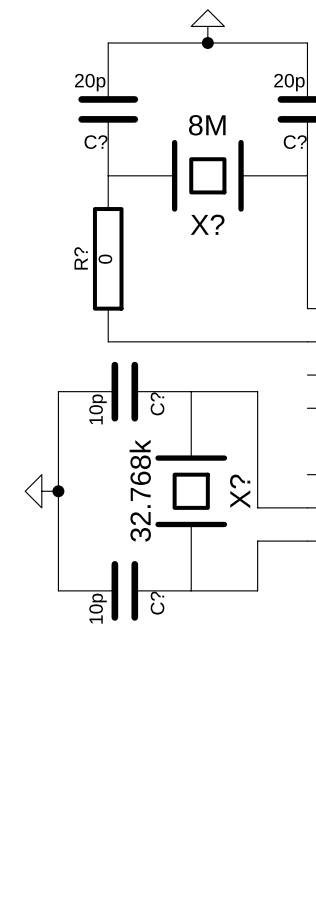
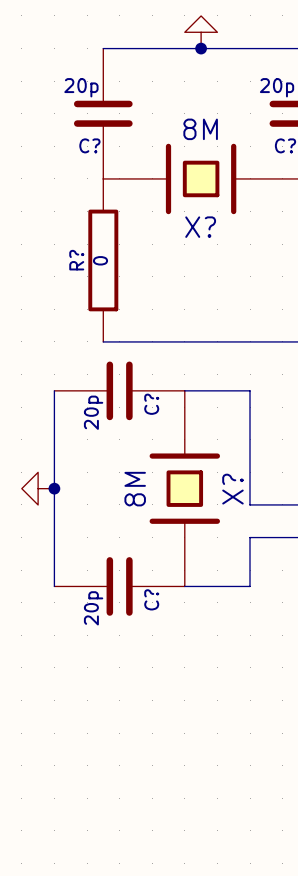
C? value: 10p (98, 409) -> 20p (93, 412)
X? value: 32.768k (140, 490) -> 8M (135, 489)
C? value: 10p (98, 608) -> 20p (93, 608)

